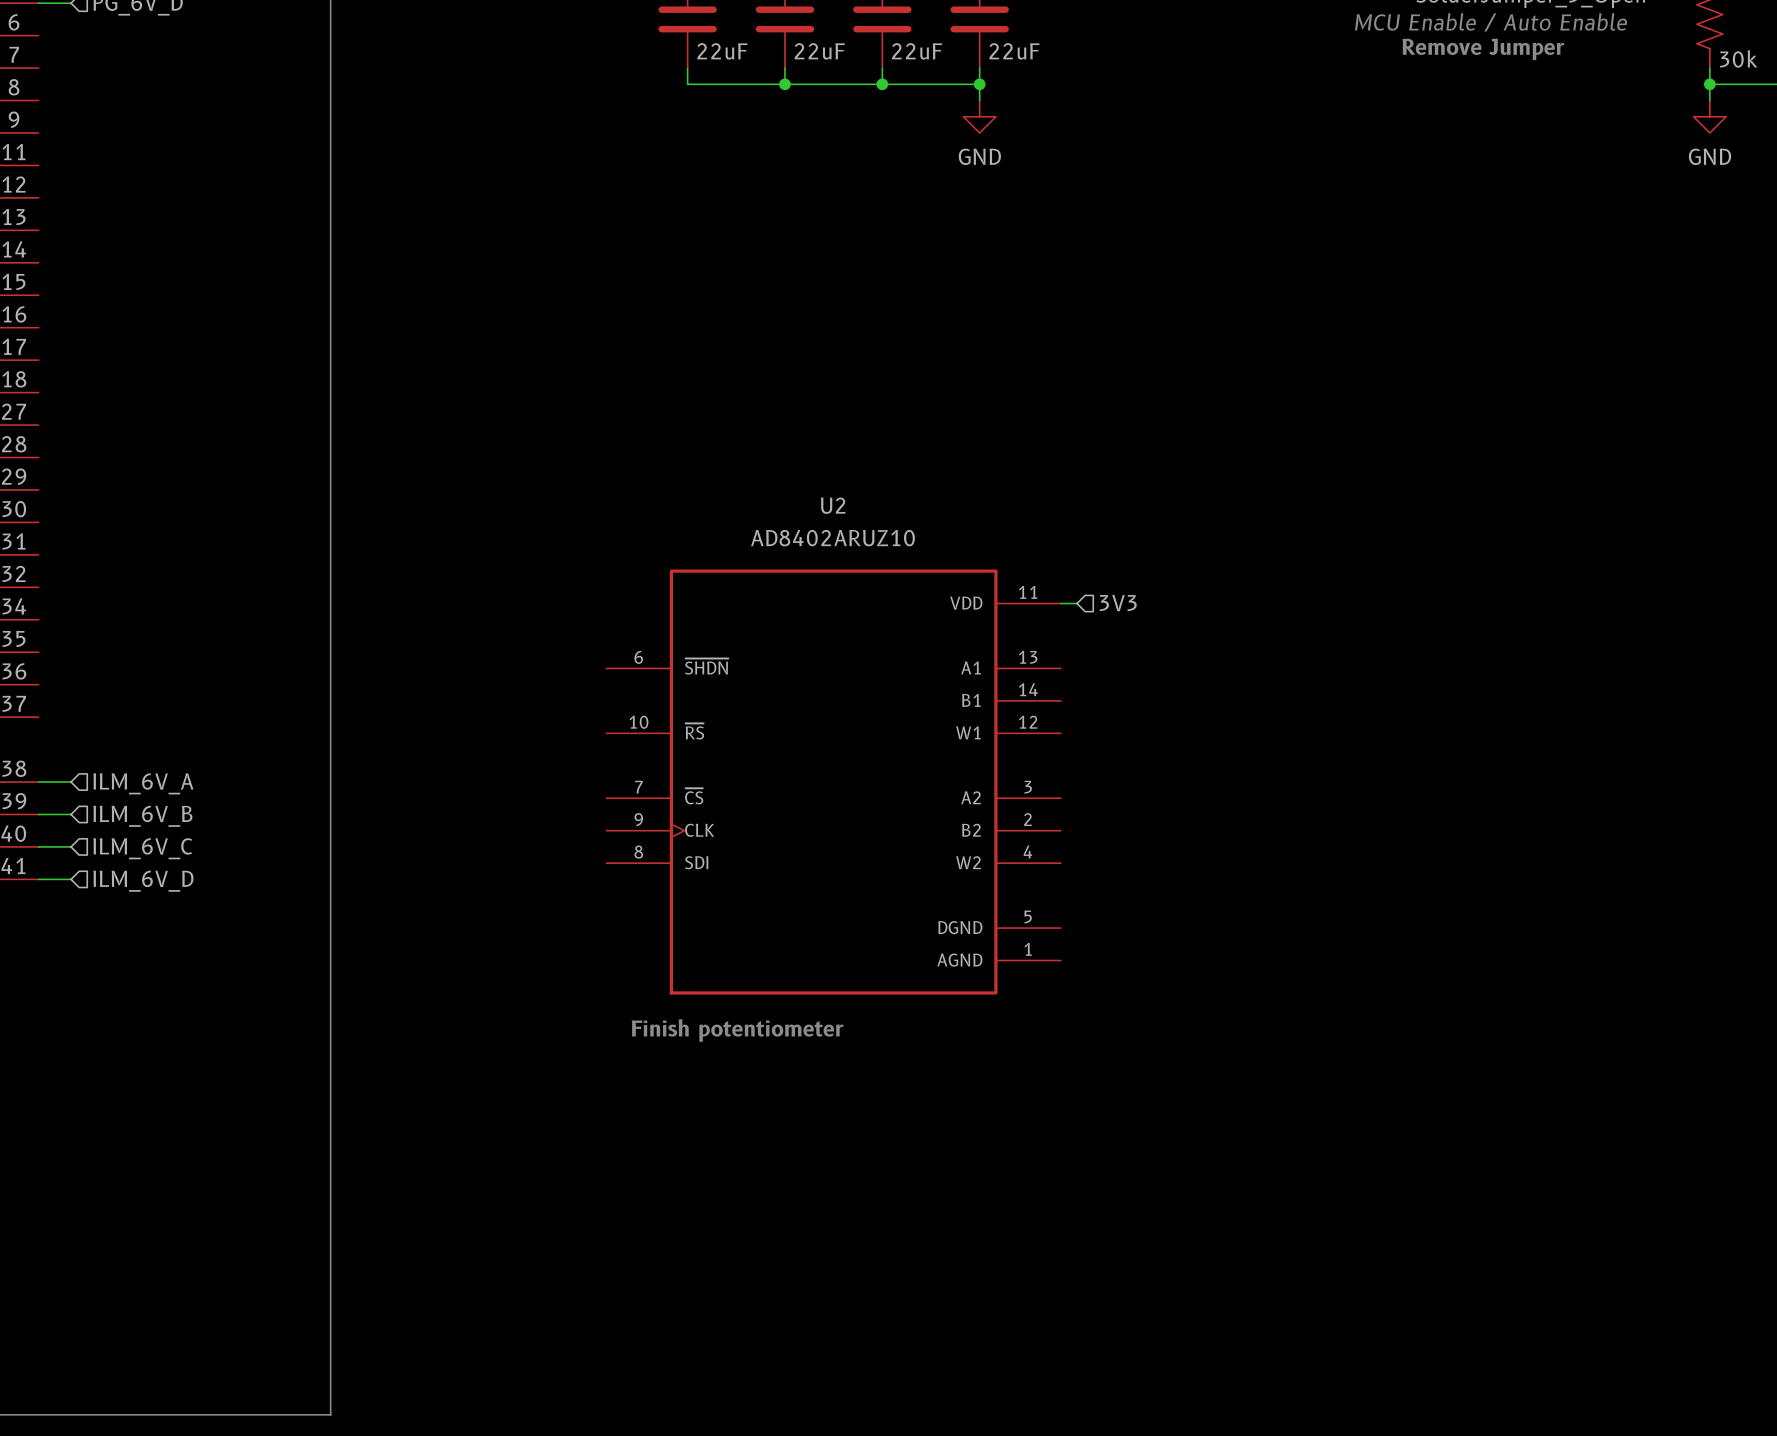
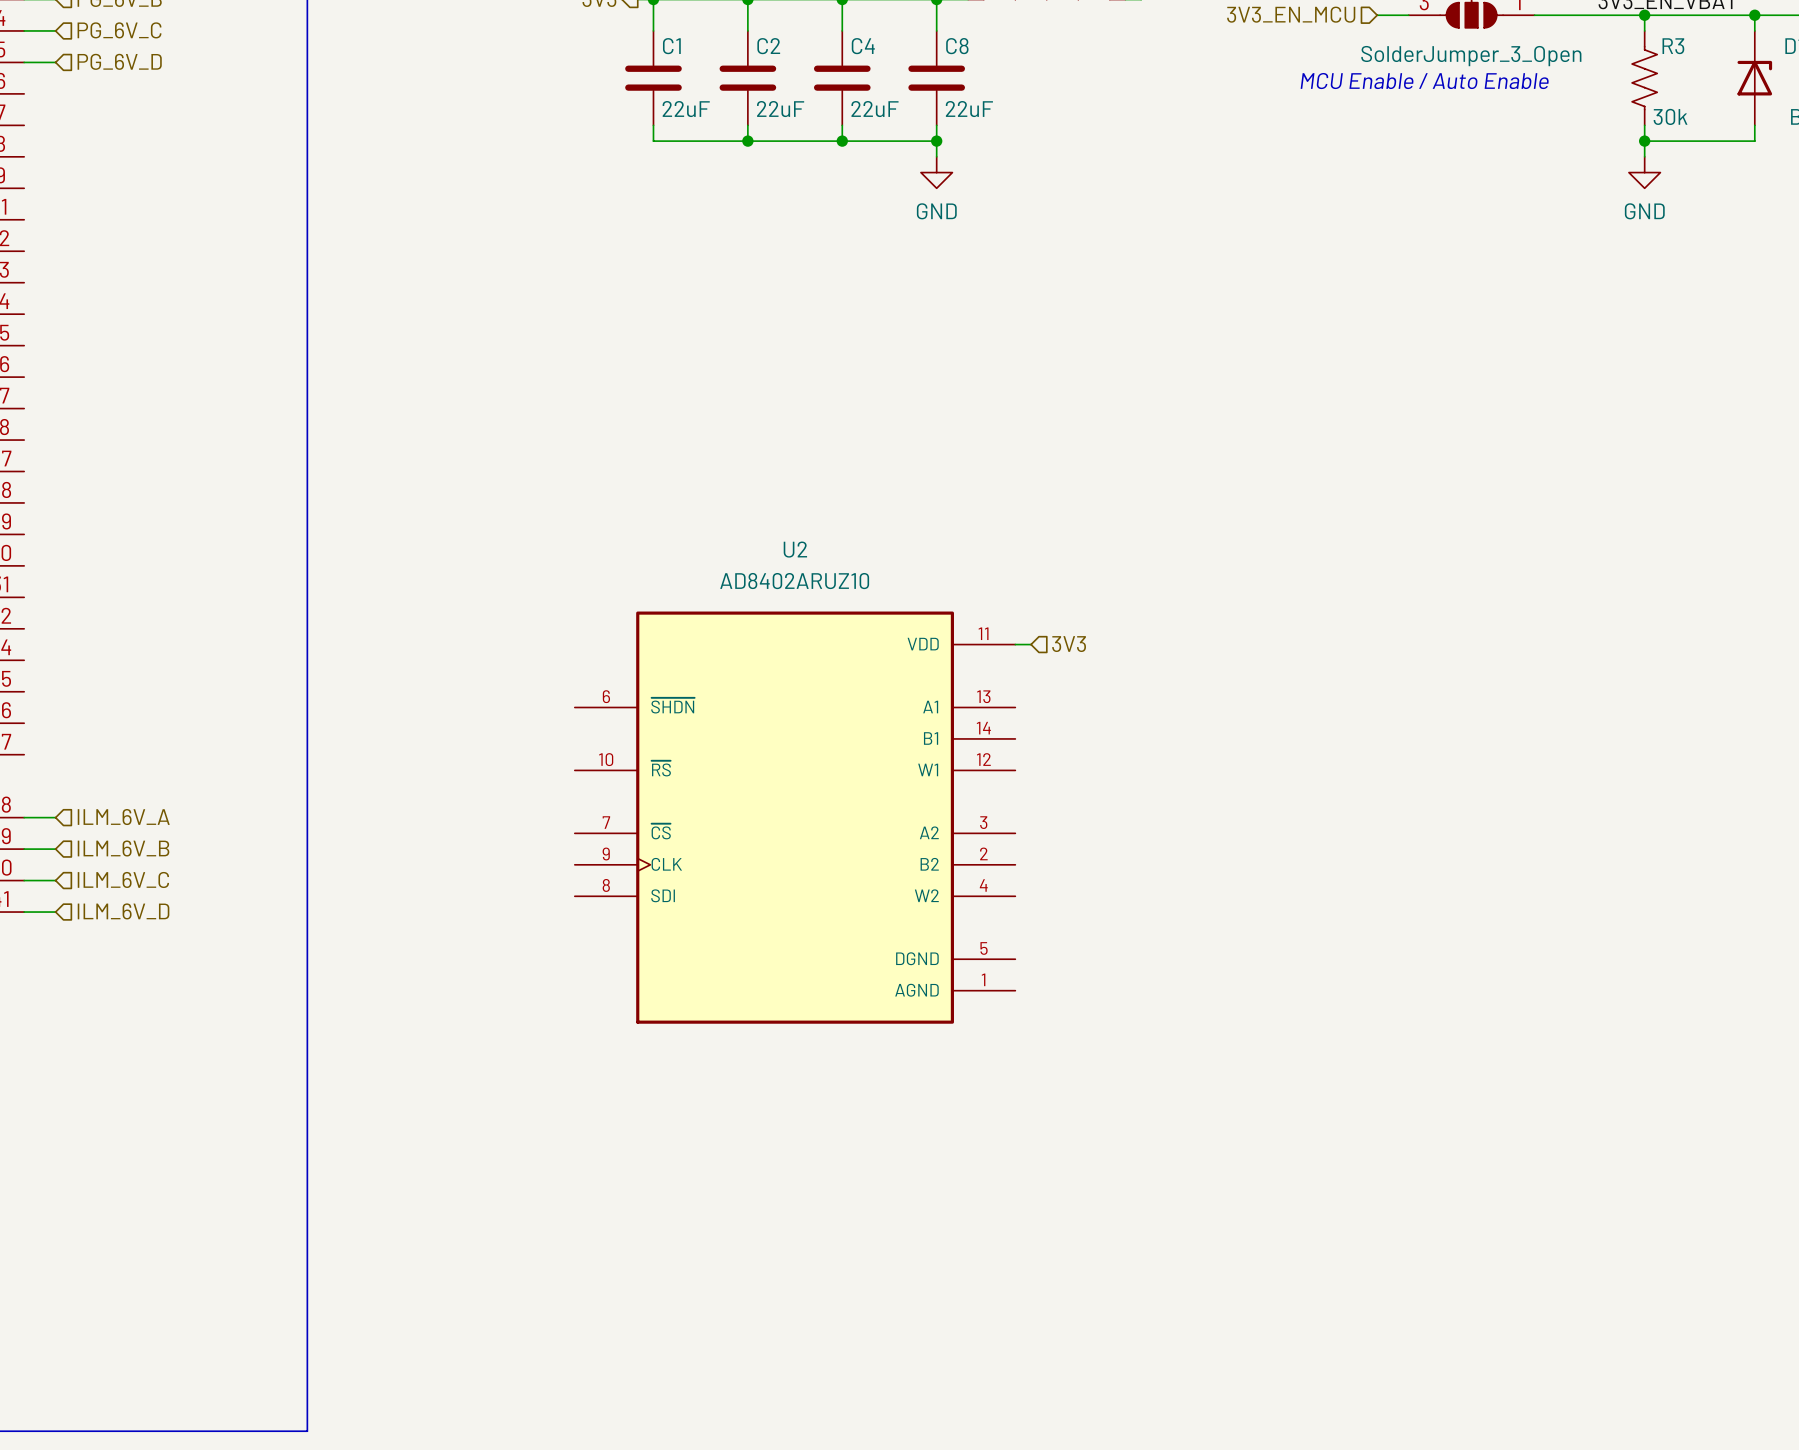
text: Remove Jumper (1483, 49) -> none
text: Finish potentiometer (737, 1030) -> none

